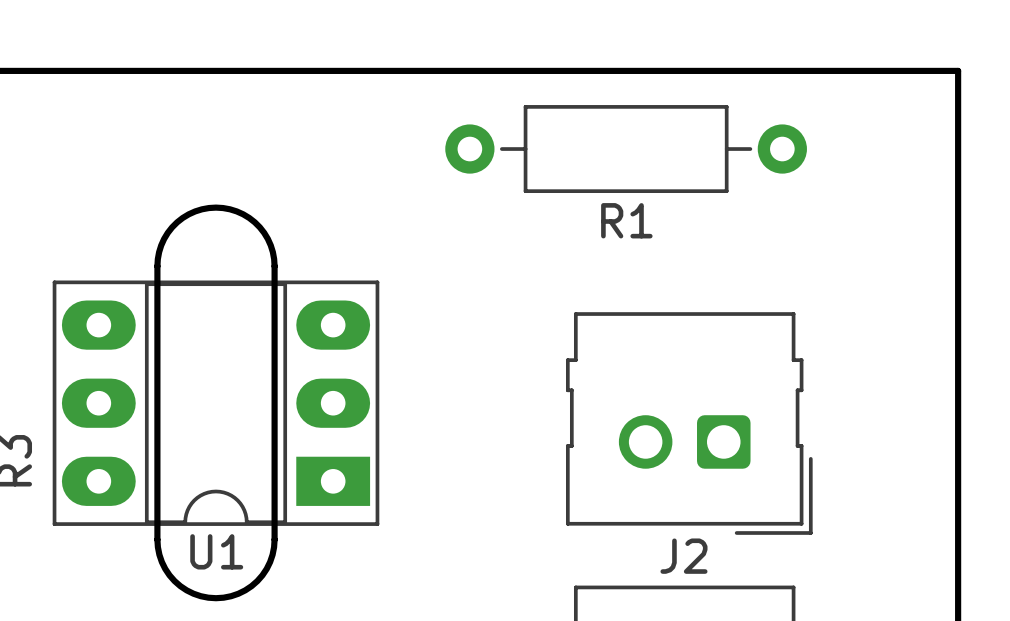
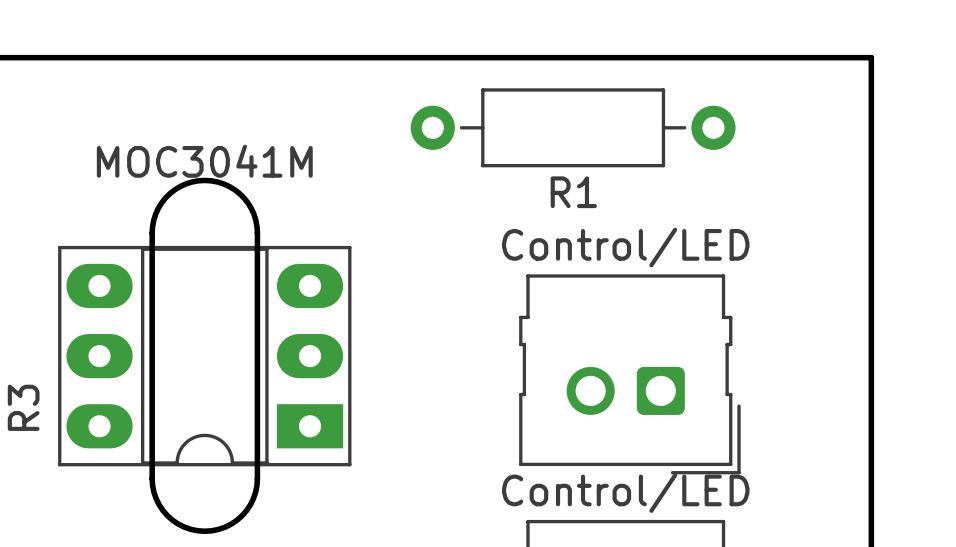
U1 value: none -> MOC3041M (204, 161)
J2 value: none -> Control/LED (625, 247)
U1 name: U1 (216, 551) -> none
part value: none -> Control/LED (625, 493)
J2 name: J2 (683, 556) -> none

